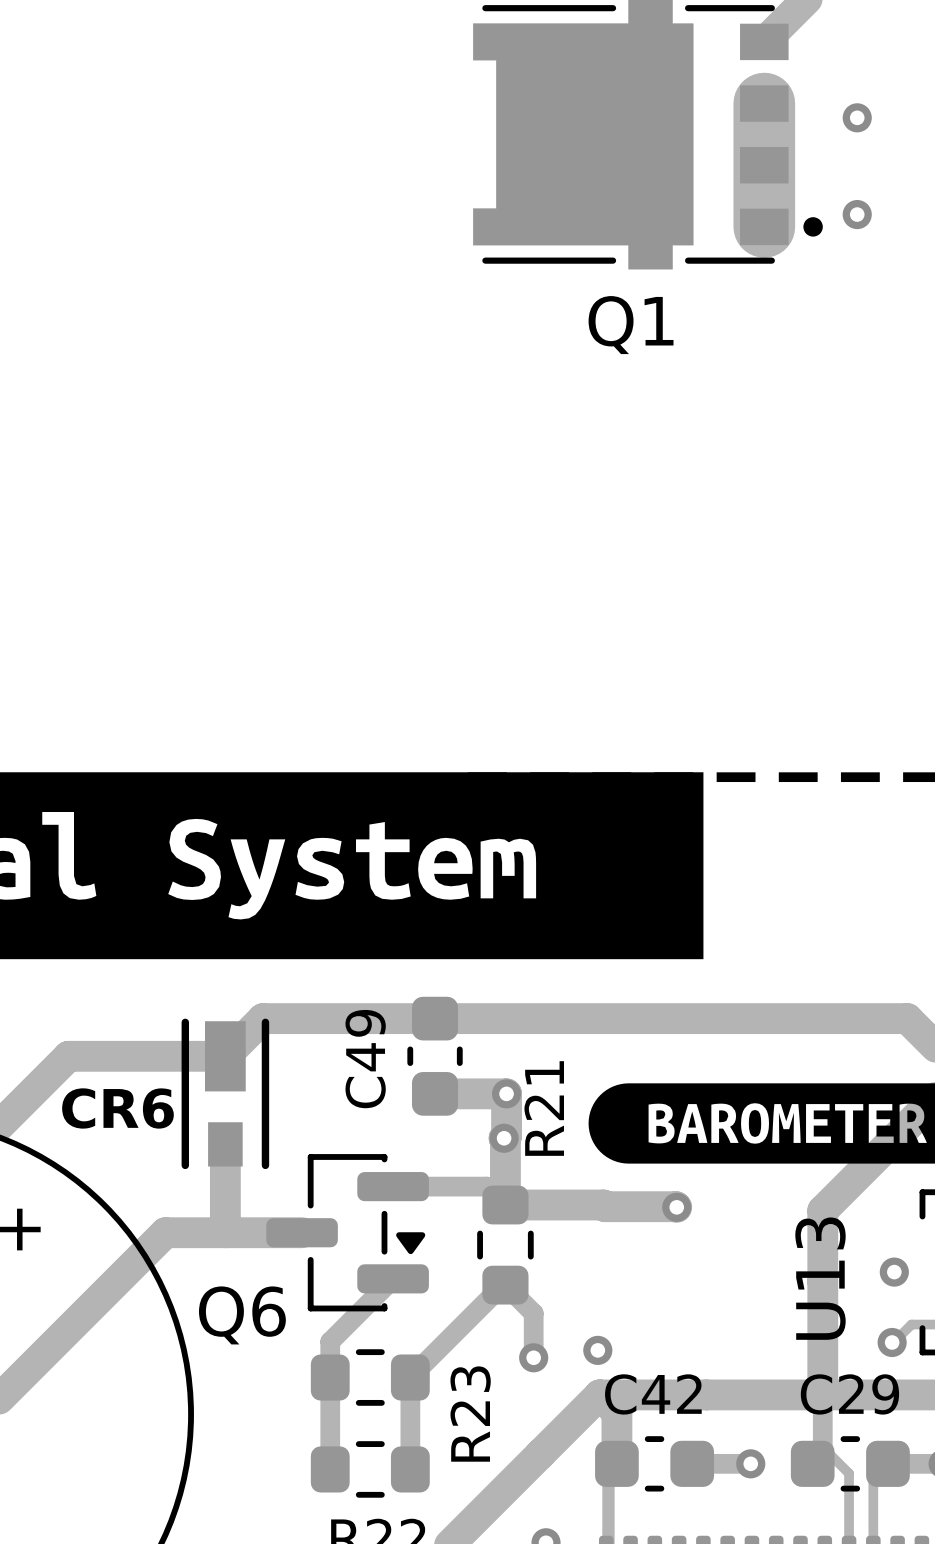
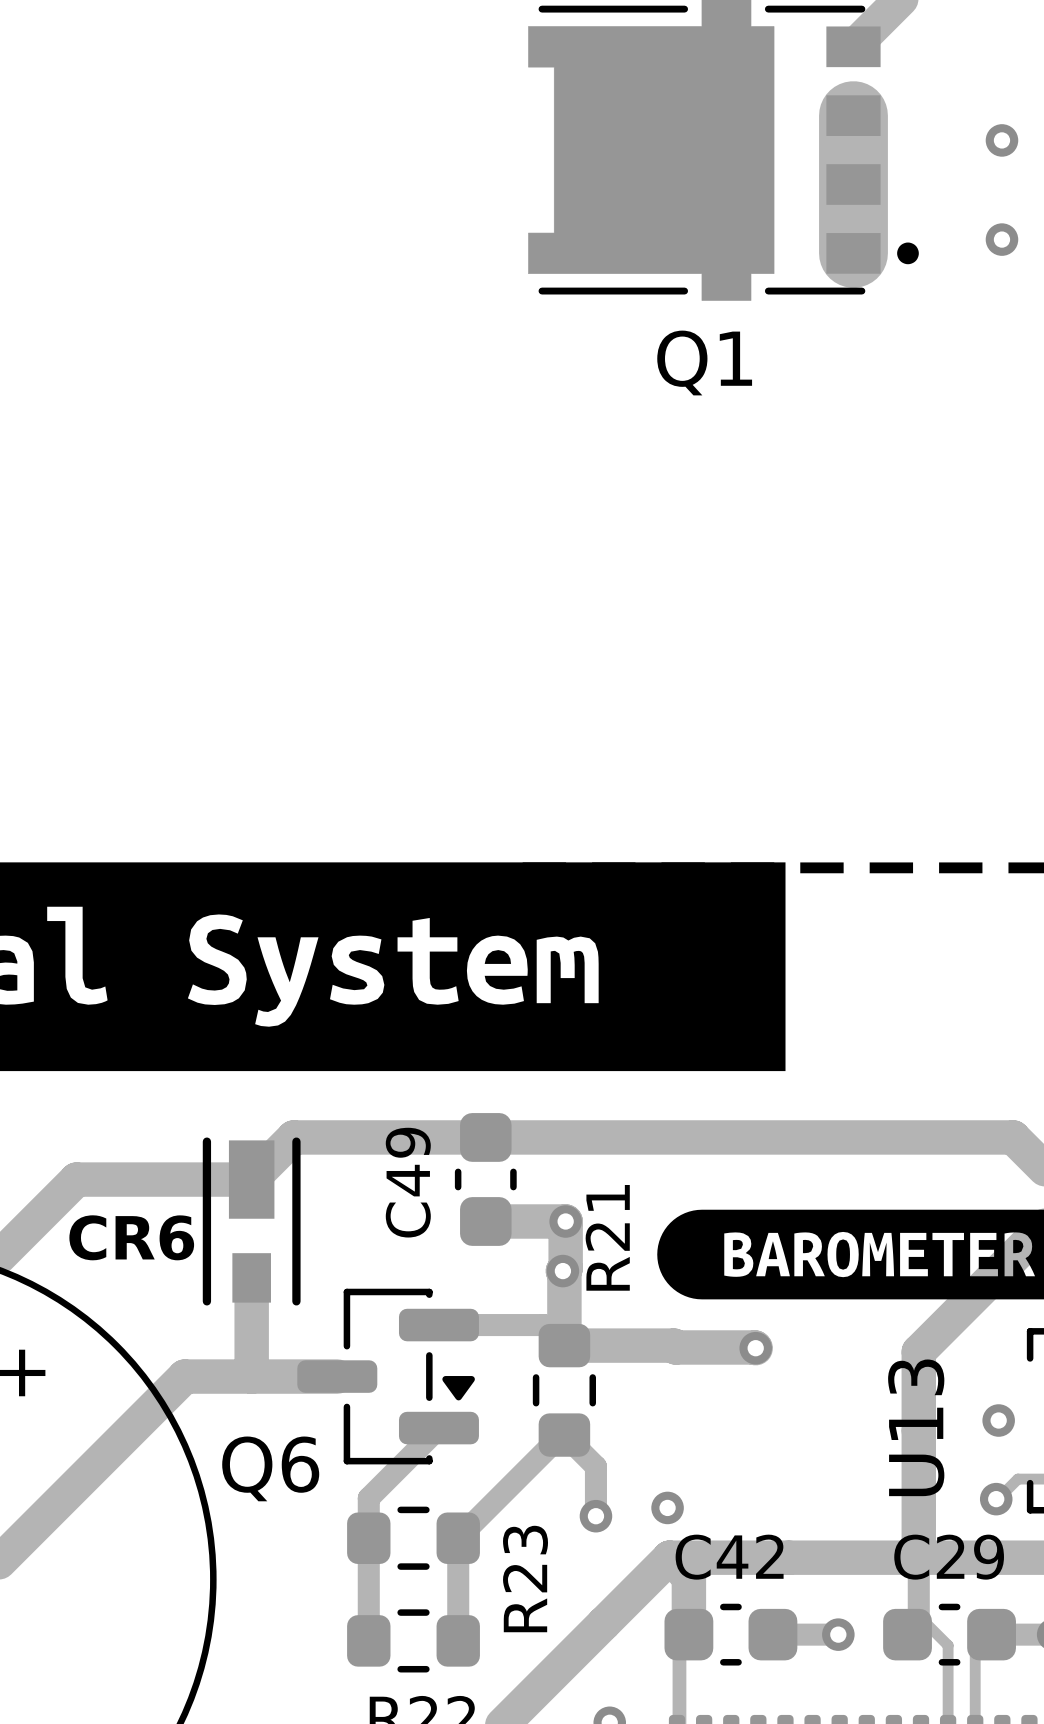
via: (857, 117) -> none
via: none -> (1001, 140)
via position: (857, 214) -> (1001, 239)

